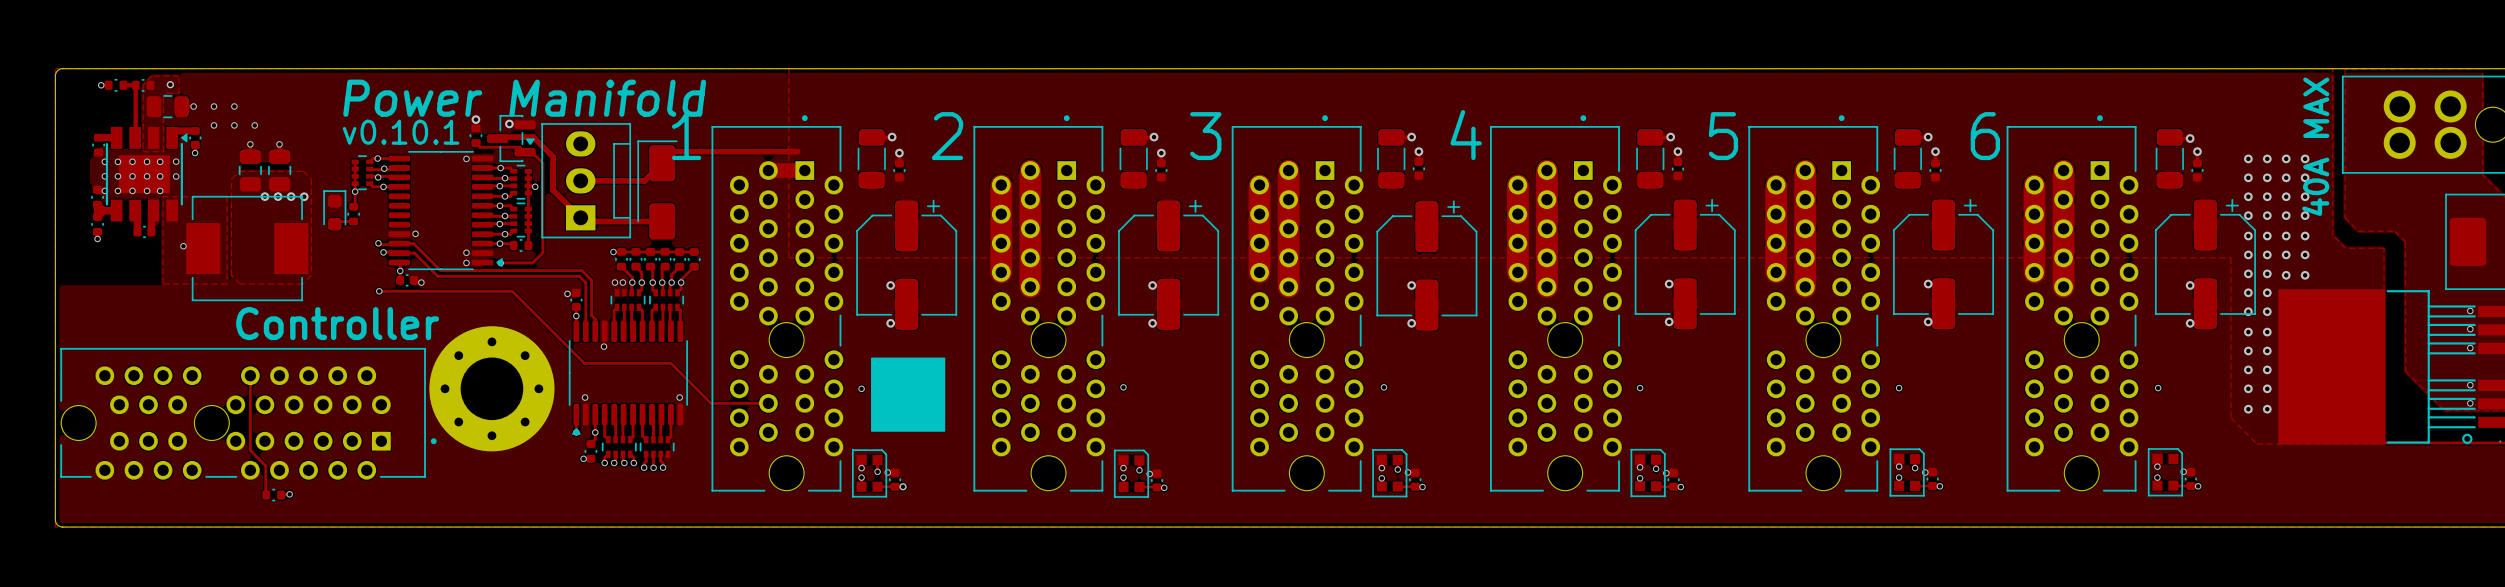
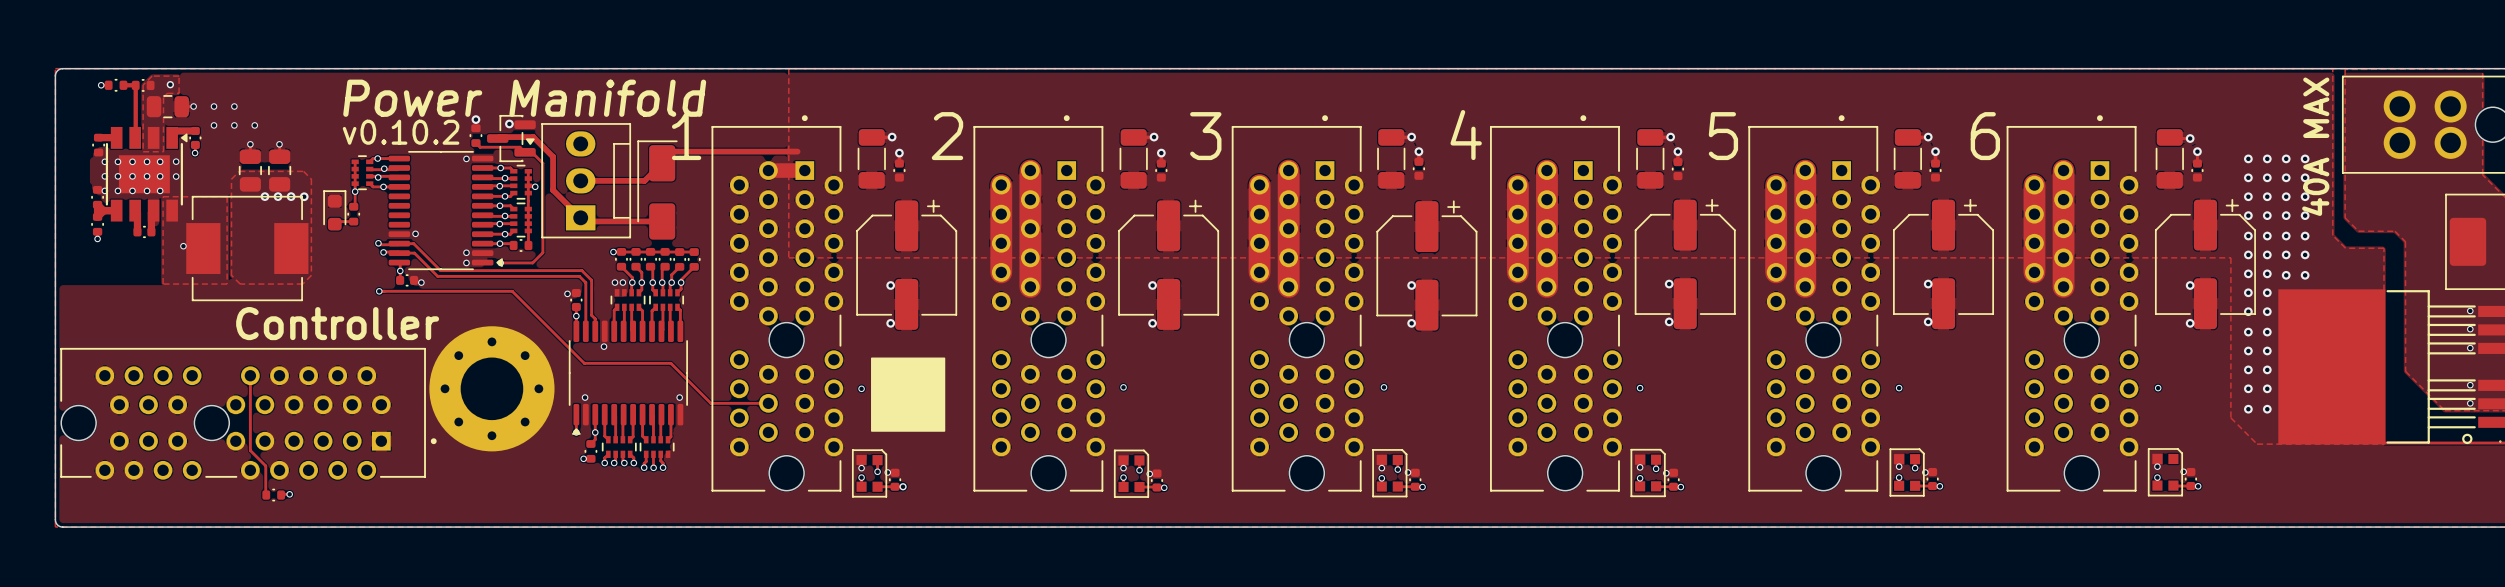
text: v0.10.1 (401, 132) -> v0.10.2 (401, 132)

